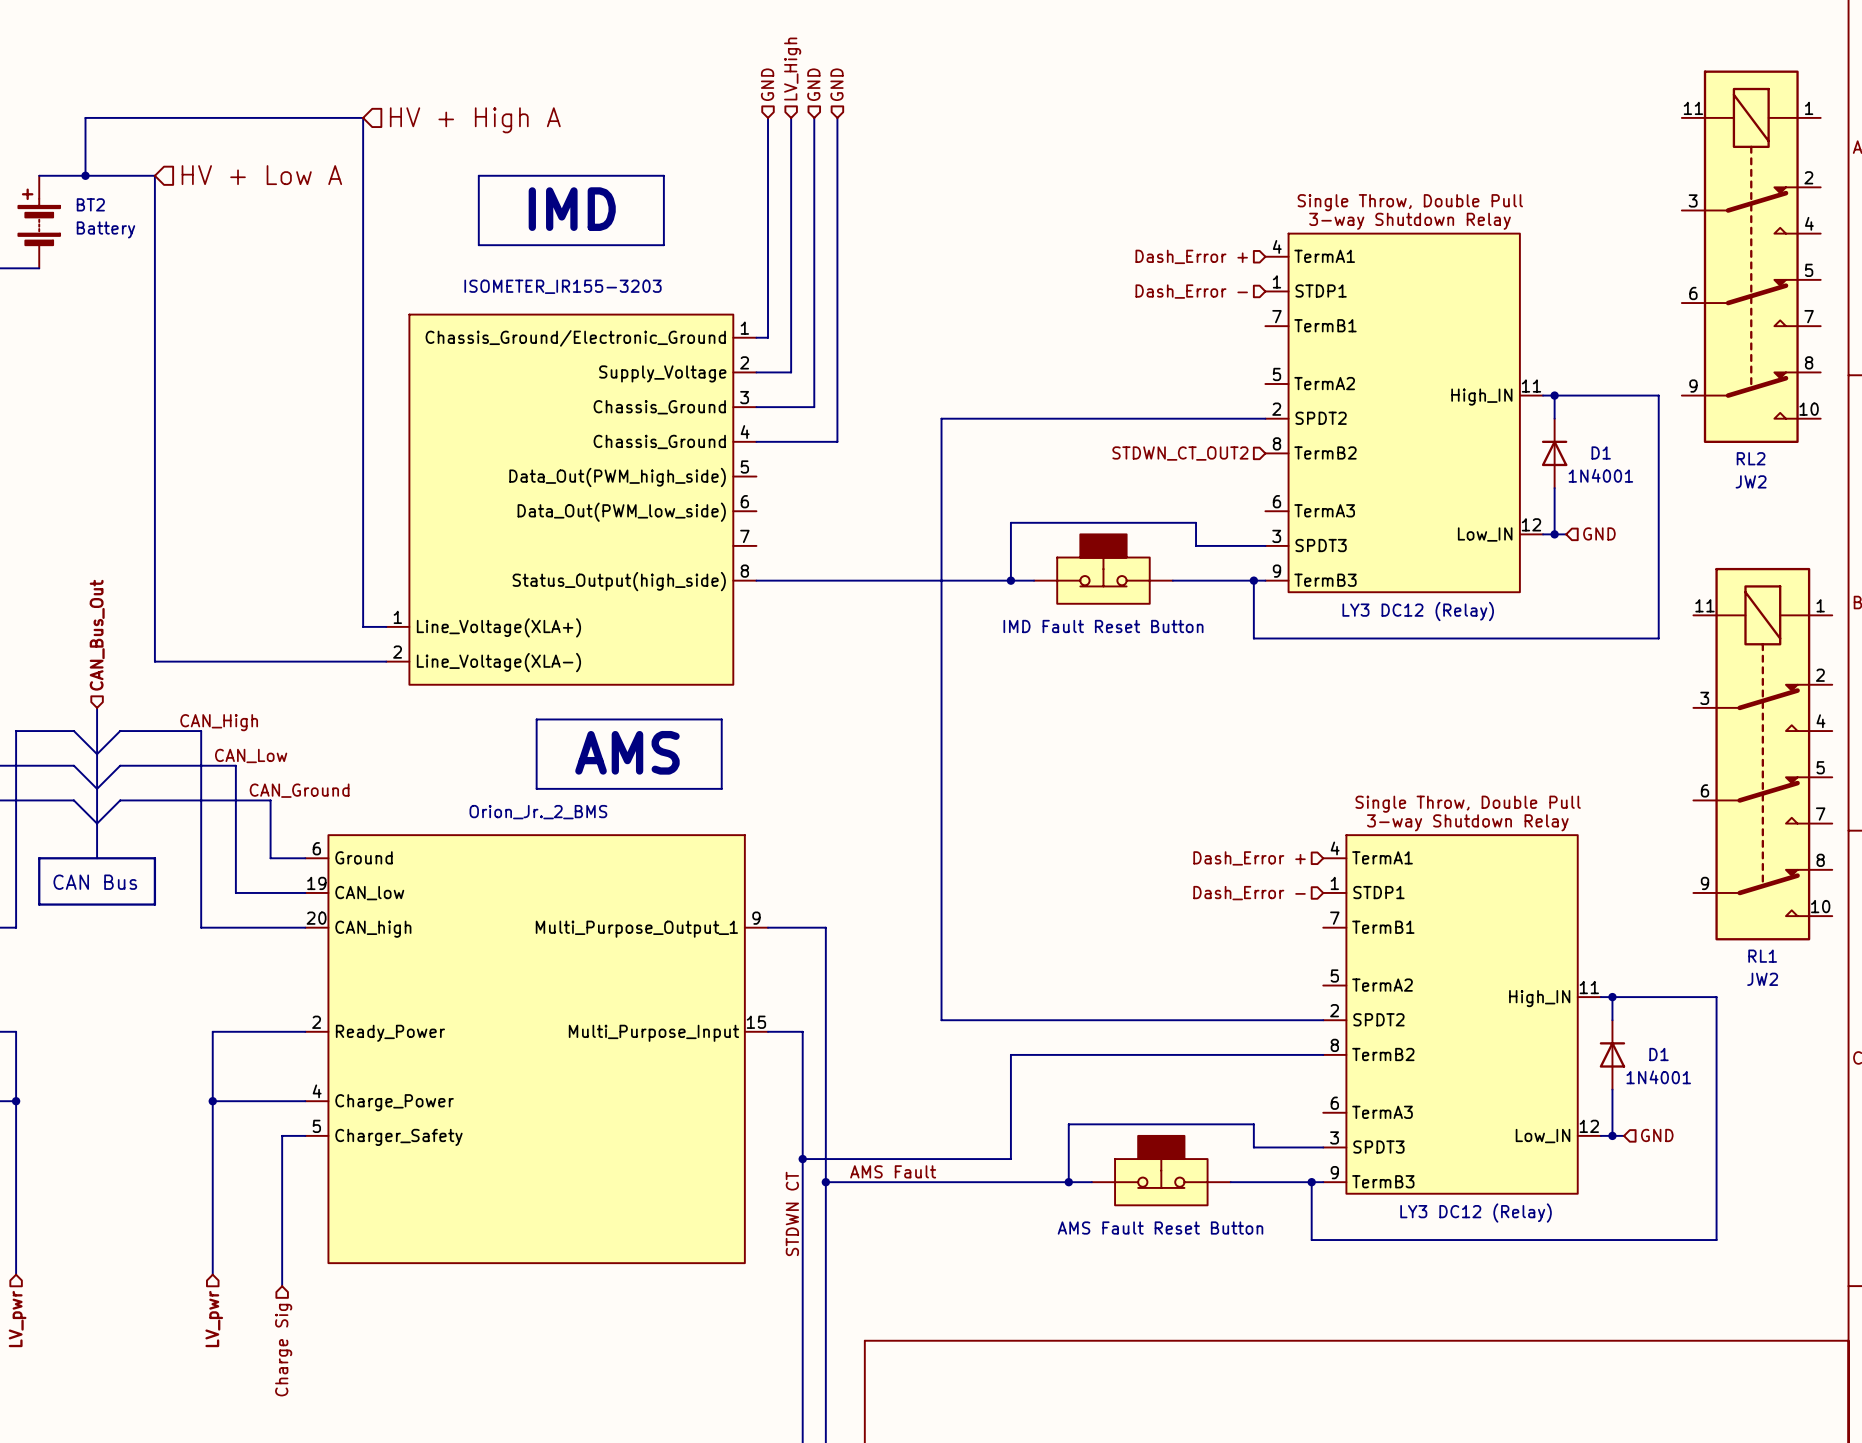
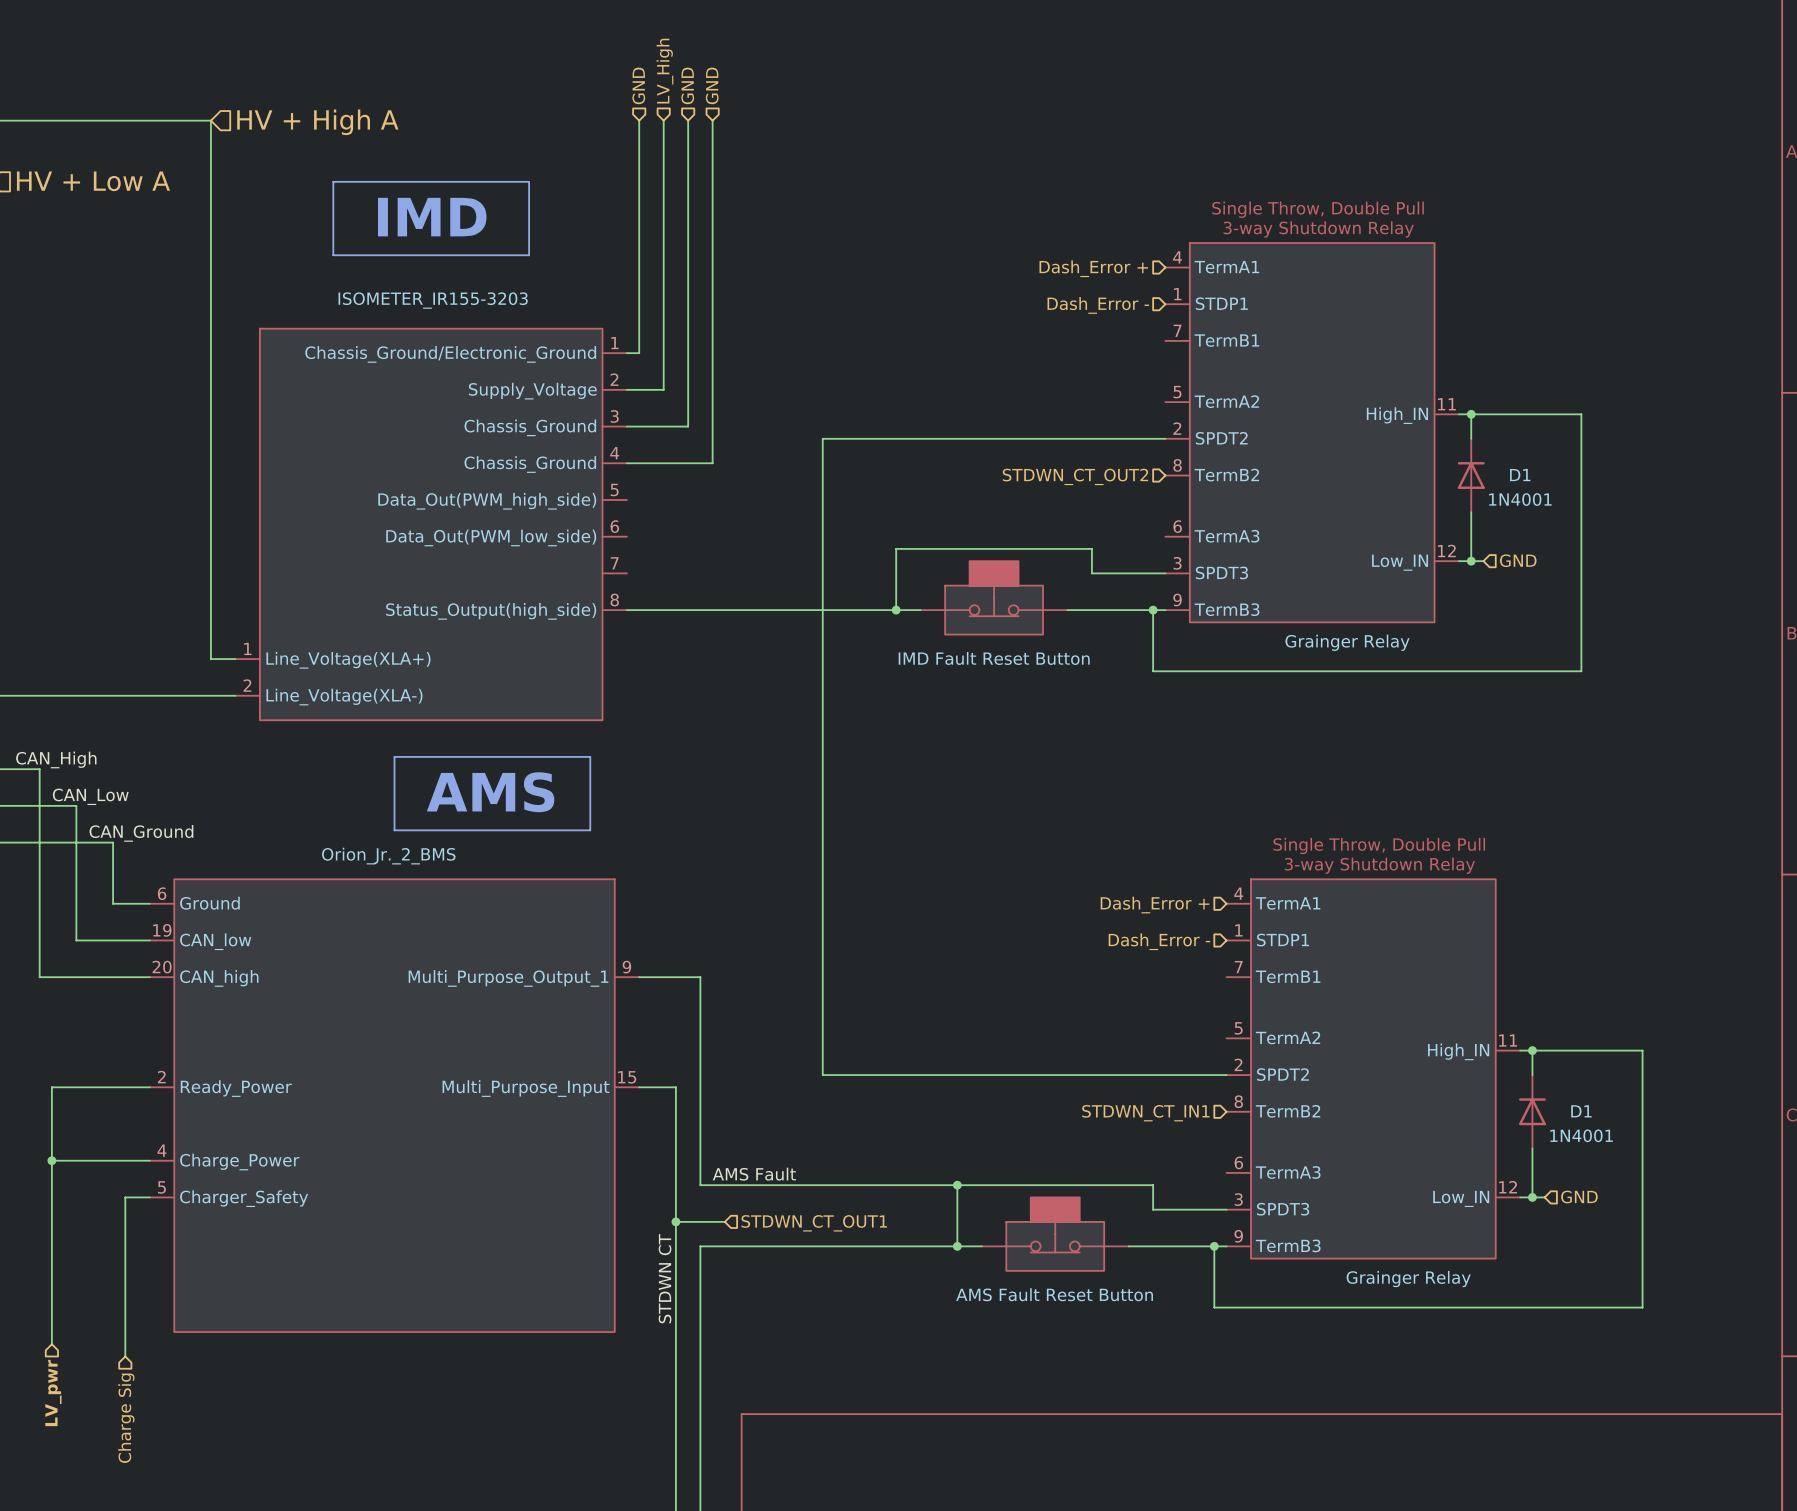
RL2: JW2 (1751, 256) -> none
part value: LY3 DC12 (Relay) (1418, 611) -> Grainger Relay (1347, 642)
RL1: JW2 (1762, 754) -> none
wire: (1323, 1054) (1010, 1054) (1010, 1159) (848, 1159) -> none
hierarchical label: none -> STDWN_CT_IN1 (1145, 1113)
wire: (825, 1124) (825, 1182) -> (700, 1185) (957, 1185)
junction: none -> (957, 1185)
hierarchical label: none -> STDWN_CT_OUT1 (814, 1223)
label position: AMS Fault (893, 1171) -> AMS Fault (754, 1174)
junction: (825, 1182) -> none
part value: LY3 DC12 (Relay) (1476, 1213) -> Grainger Relay (1408, 1279)

